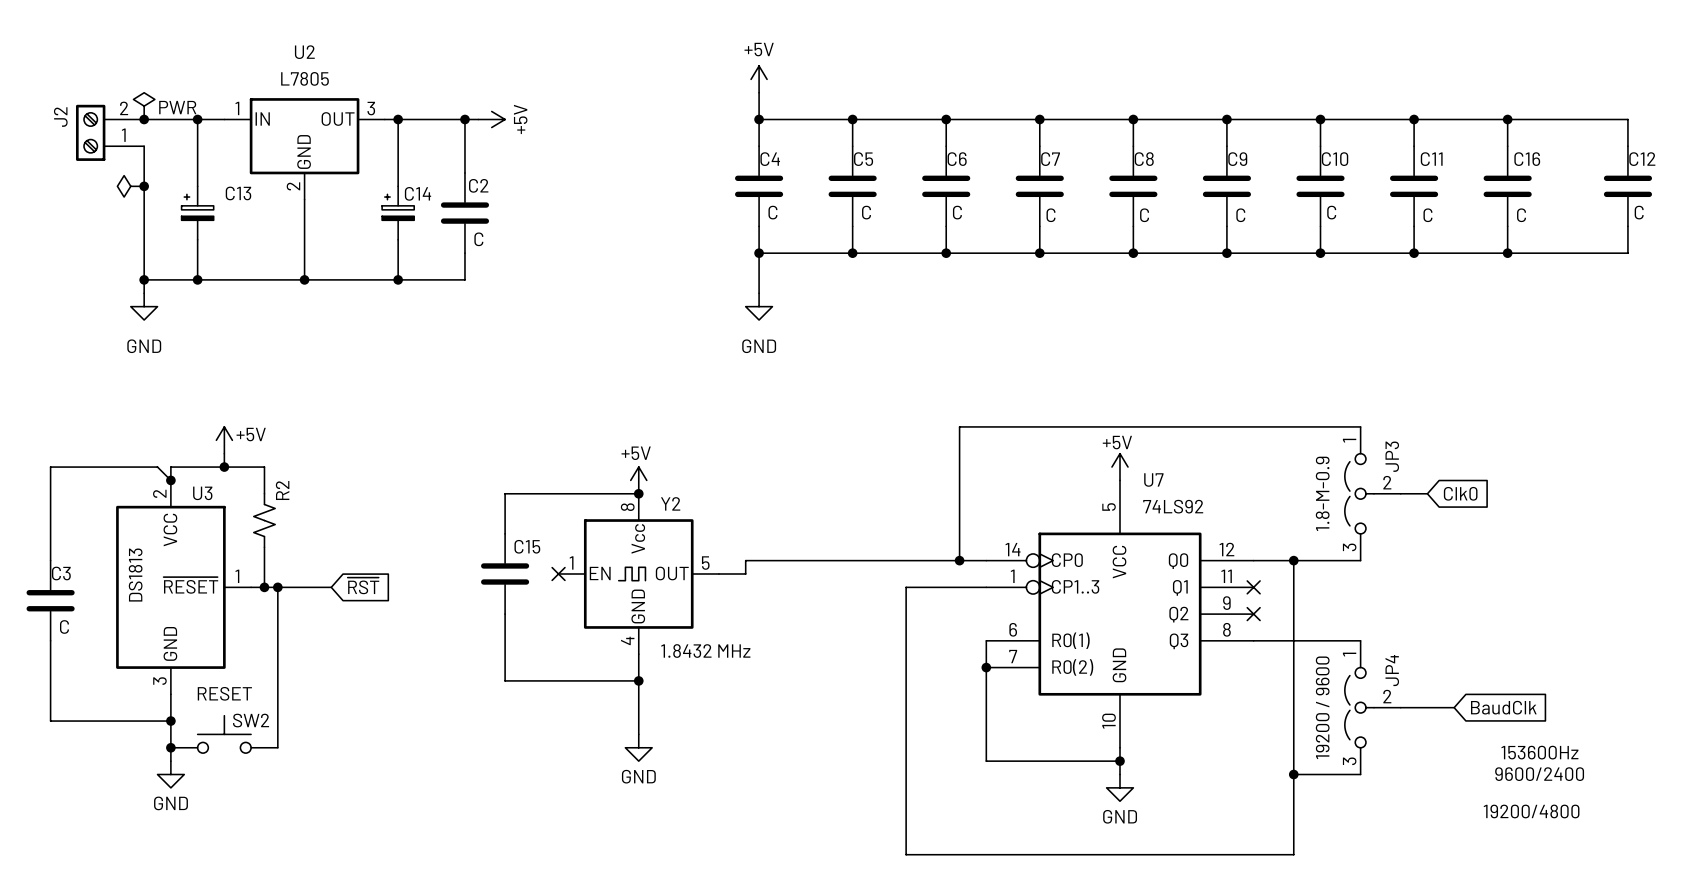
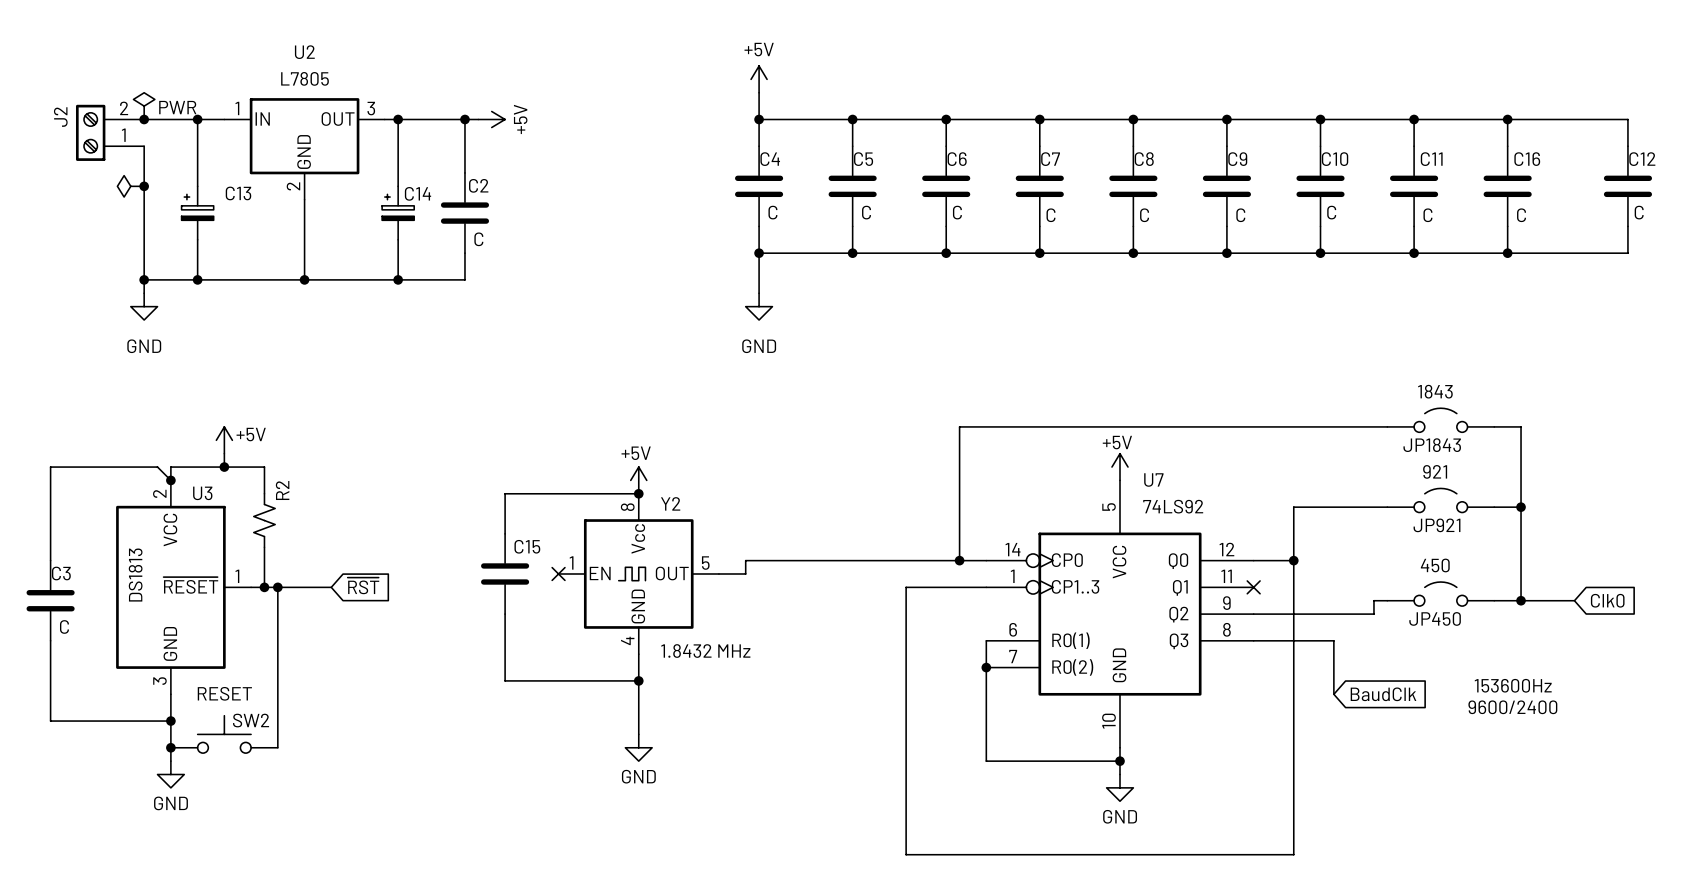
JP1843: none -> 1843 (1440, 420)
wire: none -> (1494, 426) (1521, 426) (1521, 600)
JP3: 1.8-M-0.9 (1372, 493) -> none
wire: (1400, 493) (1427, 493) -> (1360, 426) (1387, 426)
global label position: Clk0 (1460, 493) -> Clk0 (1607, 600)
JP921: none -> 921 (1440, 500)
wire: none -> (1494, 507) (1521, 507)
junction: none -> (1521, 507)
wire: (1293, 560) (1360, 560) -> (1293, 560) (1293, 507) (1387, 507)
JP450: none -> 450 (1440, 594)
wire: none -> (1387, 600) (1373, 600) (1373, 614) (1253, 614)
wire: none -> (1494, 600) (1574, 600)
junction: none -> (1521, 600)
no-connect mark: (1253, 614) -> none
wire: (1333, 640) (1360, 640) -> (1333, 640) (1333, 694)
JP4: 19200 / 9600 (1372, 707) -> none
wire: (1400, 707) (1454, 707) -> none
global label position: BaudClk (1503, 707) -> BaudClk (1383, 694)
text position: 153600Hz (1539, 752) -> 153600Hz (1513, 685)
wire: (1293, 774) (1360, 774) -> none
junction: (1293, 774) -> none
text position: 9600/2400 (1539, 774) -> 9600/2400 (1512, 707)
text: 19200/4800 (1531, 811) -> none

